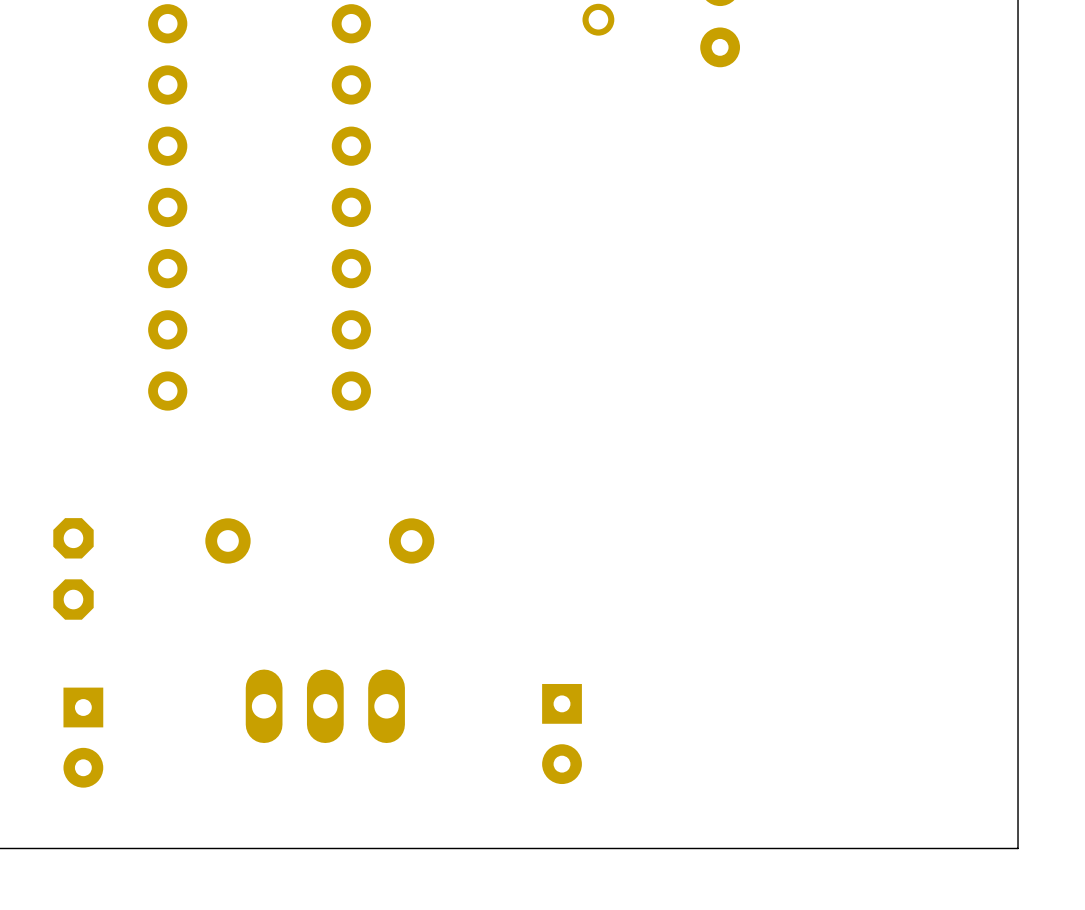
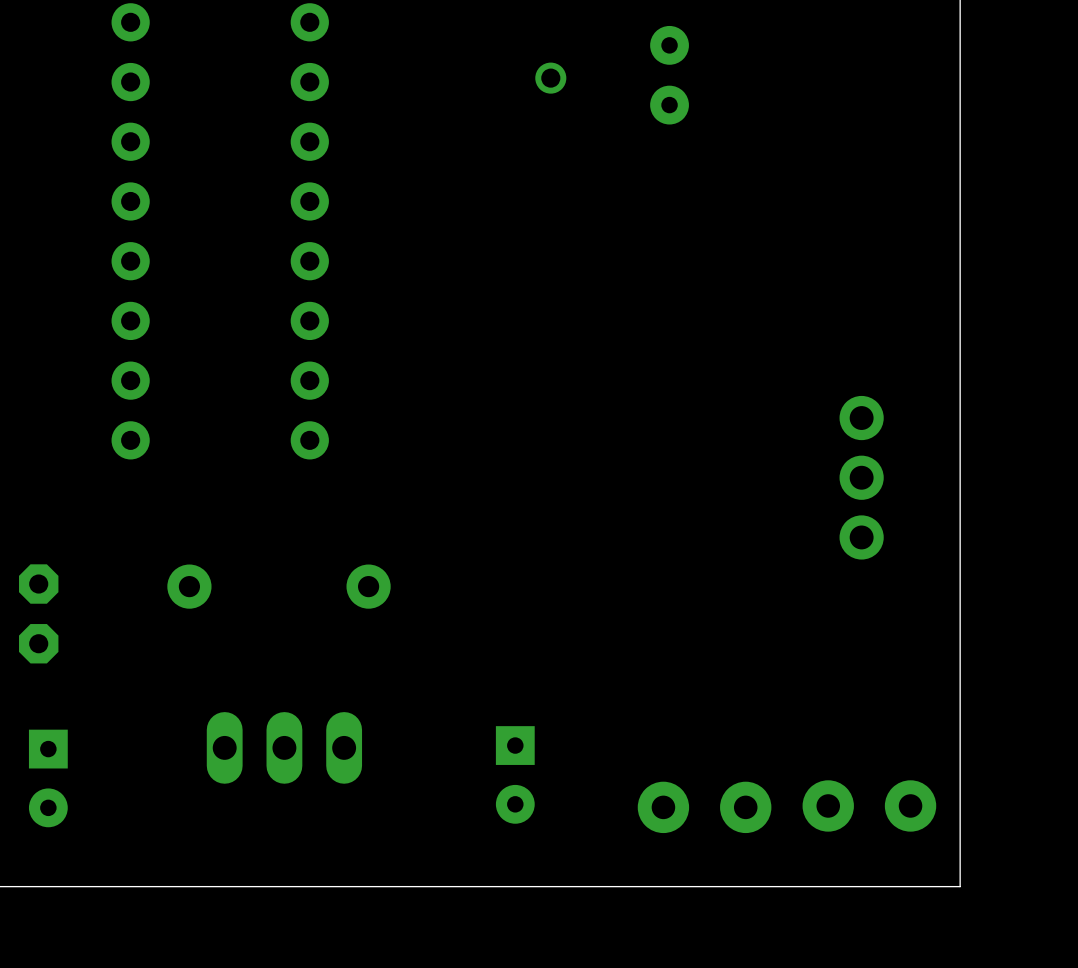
part: none -> (861, 477)
part: none -> (869, 805)
part: none -> (704, 807)

